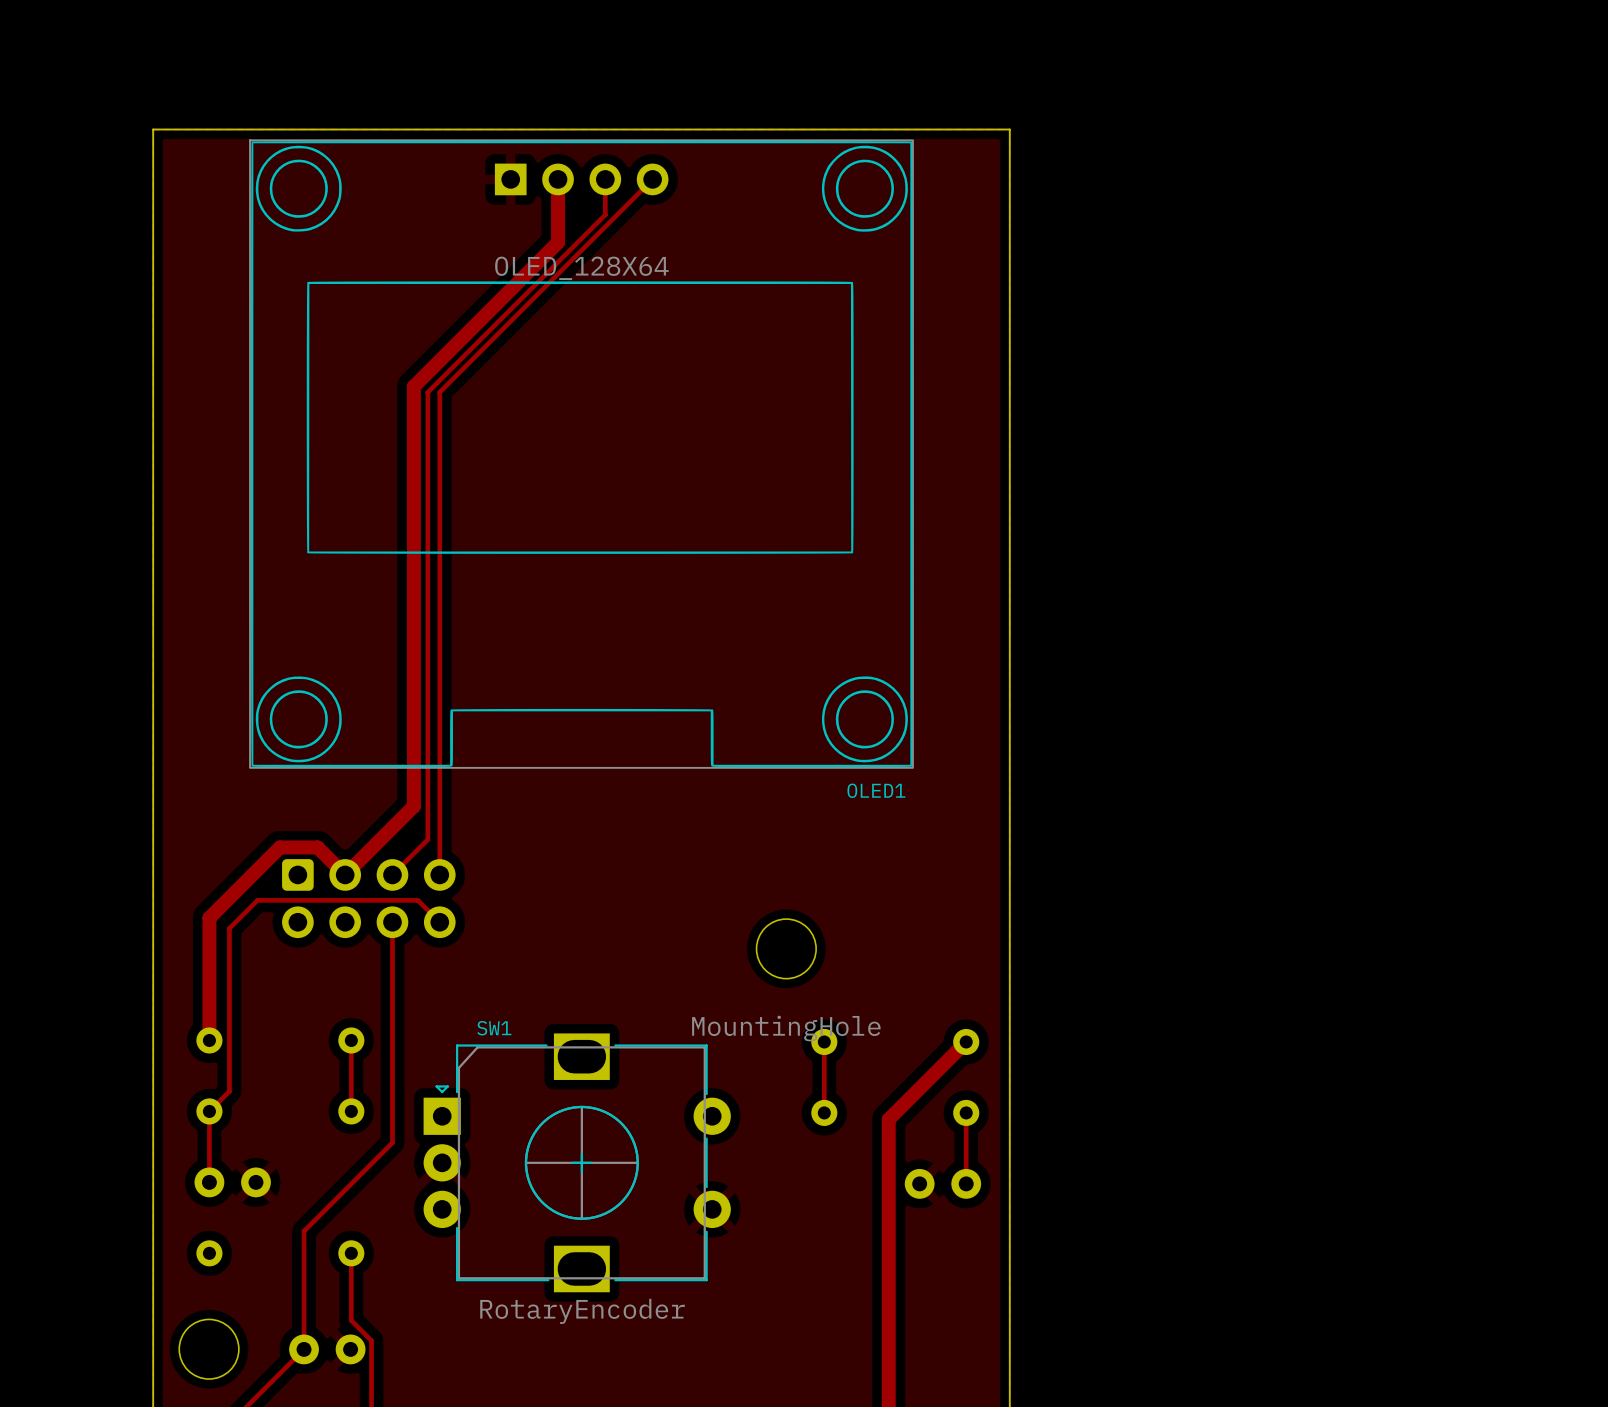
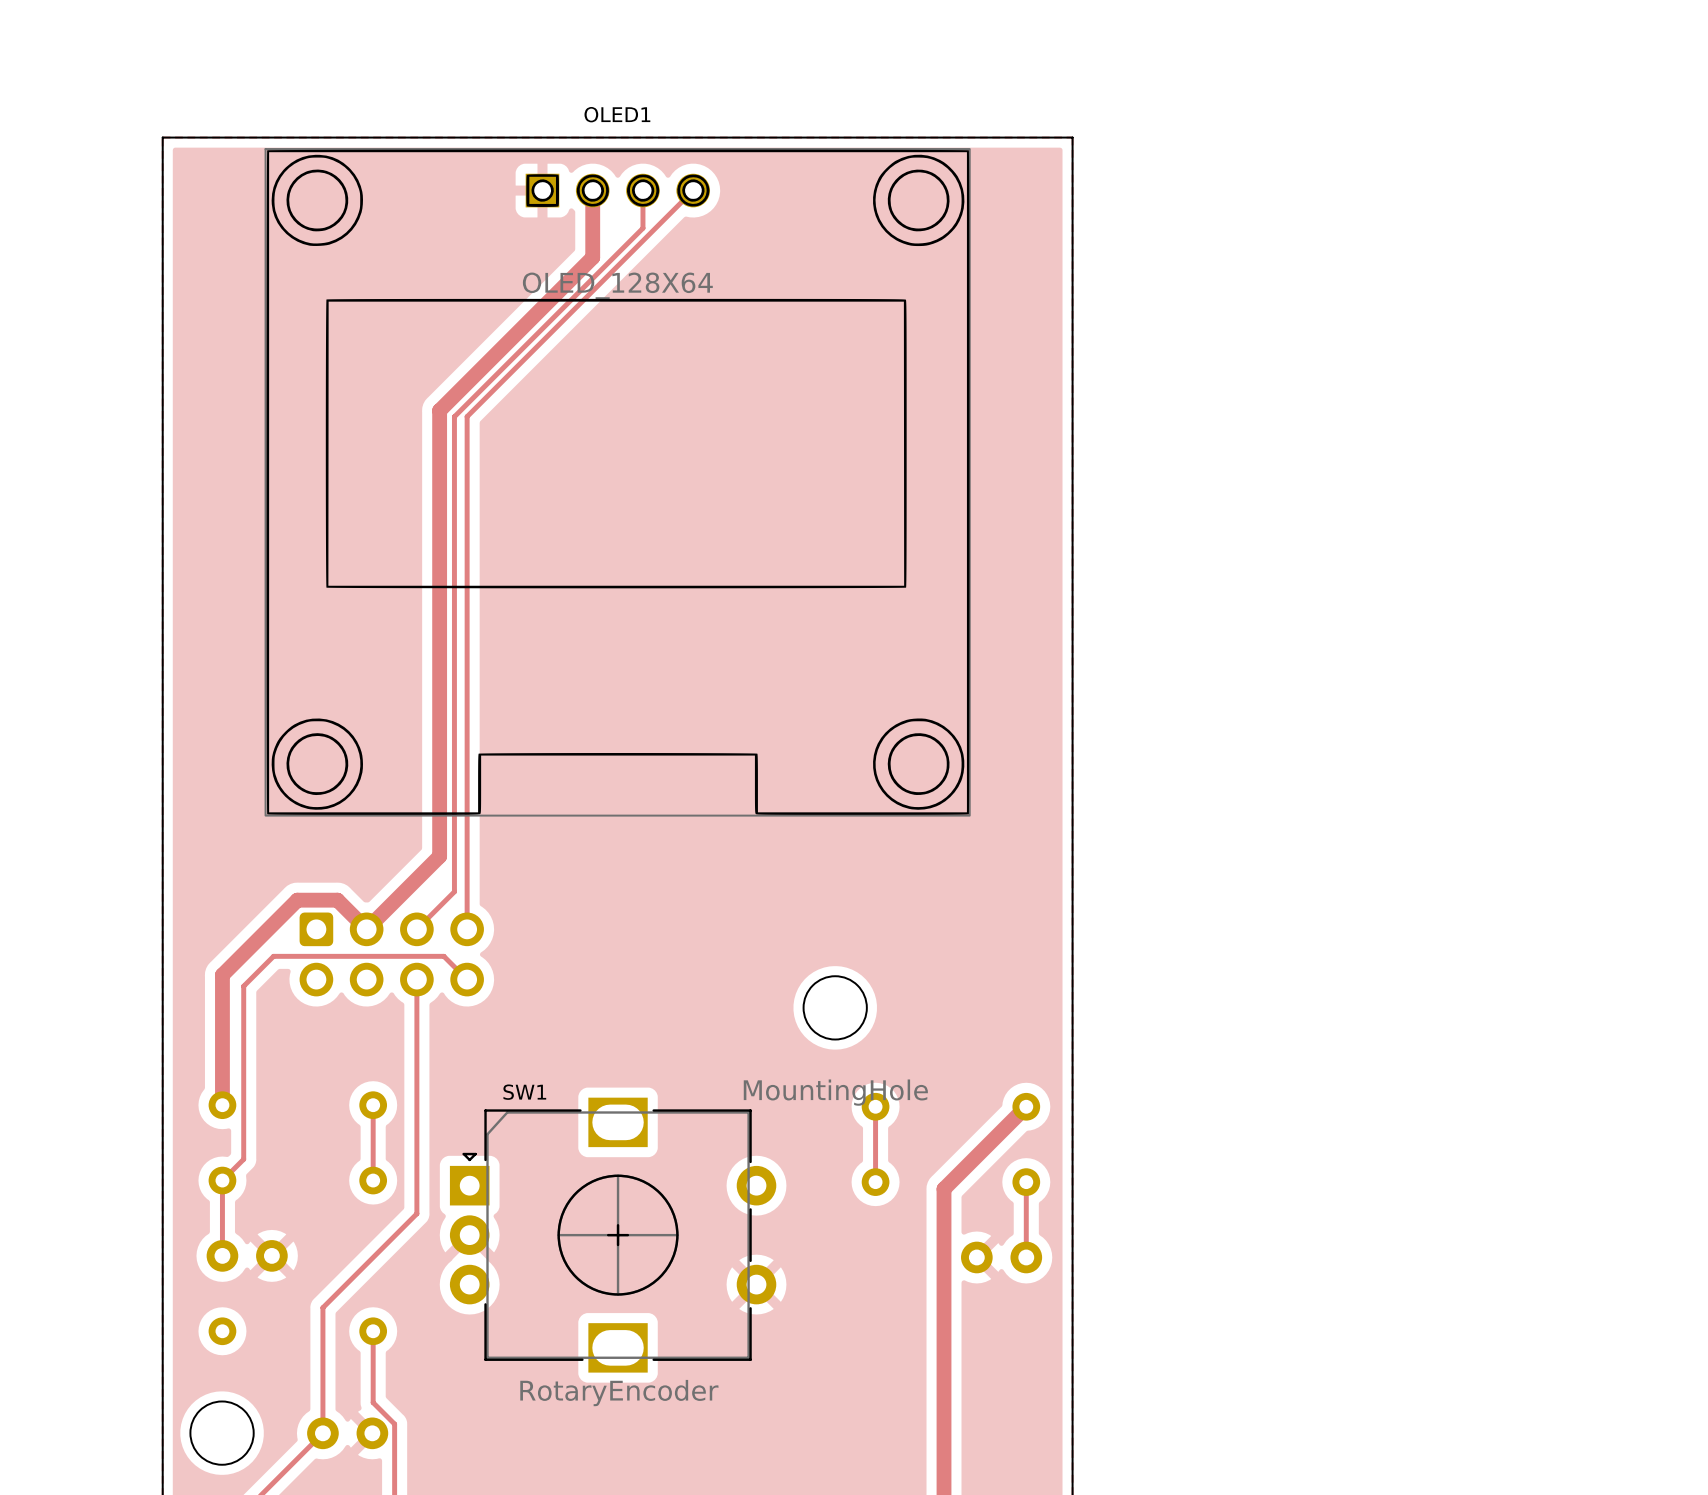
OLED1 footprint: [249, 139, 914, 769] -> [264, 148, 971, 817]
OLED1 name position: OLED1 (876, 790) -> OLED1 (617, 114)

